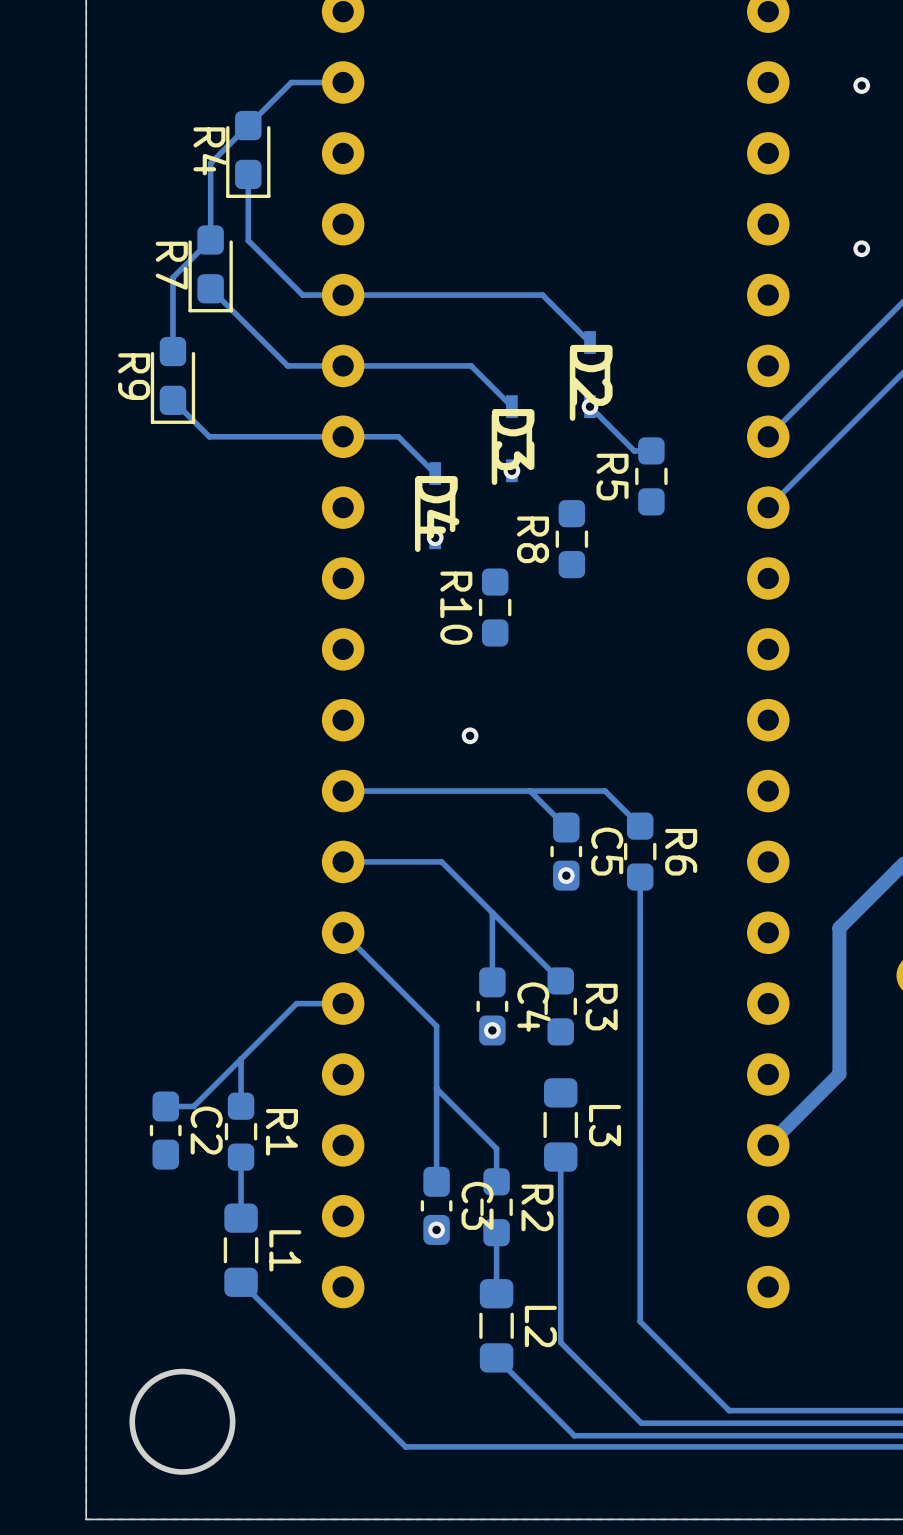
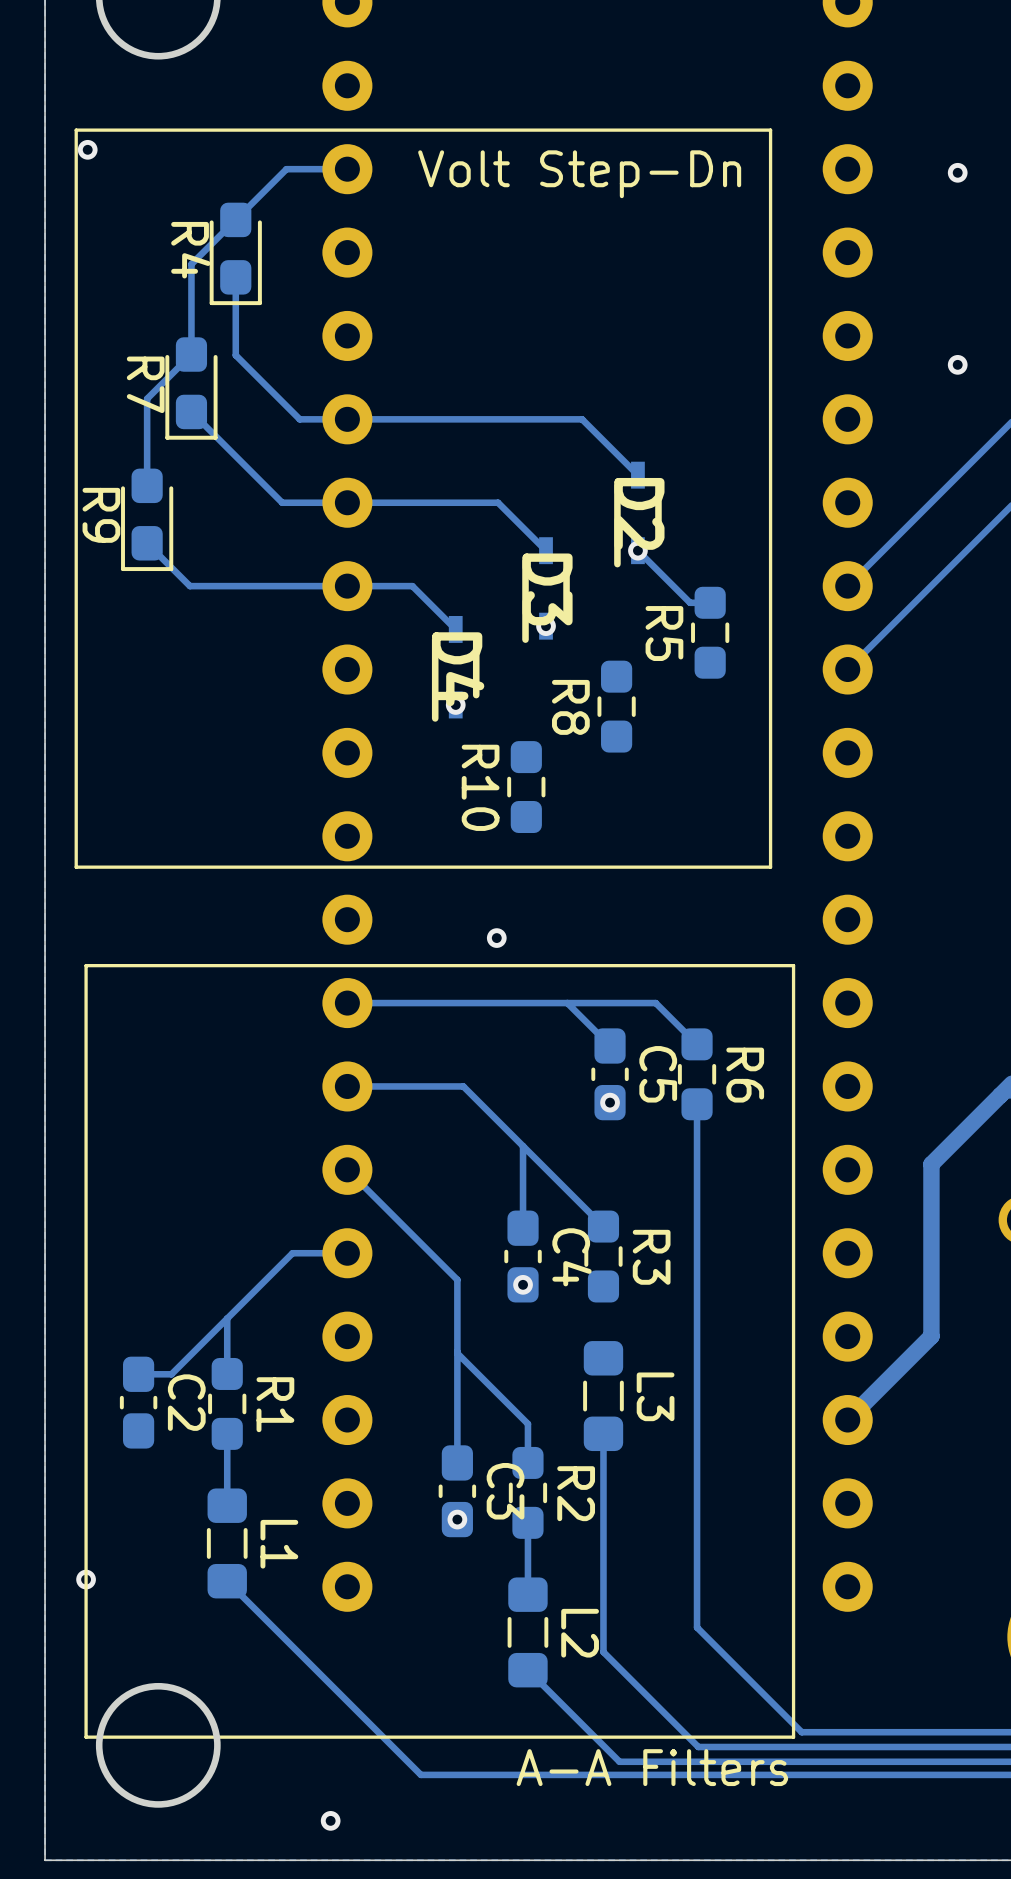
line: none -> (770, 130) (76, 130) (76, 867) (770, 867) (770, 130)
via: none -> (87, 149)
text: none -> Volt Step-Dn (579, 174)
line: none -> (793, 965) (86, 965) (86, 1737) (793, 1737) (793, 965)
via: none -> (86, 1579)
text: none -> A-A Filters (652, 1767)
via: none -> (330, 1820)

